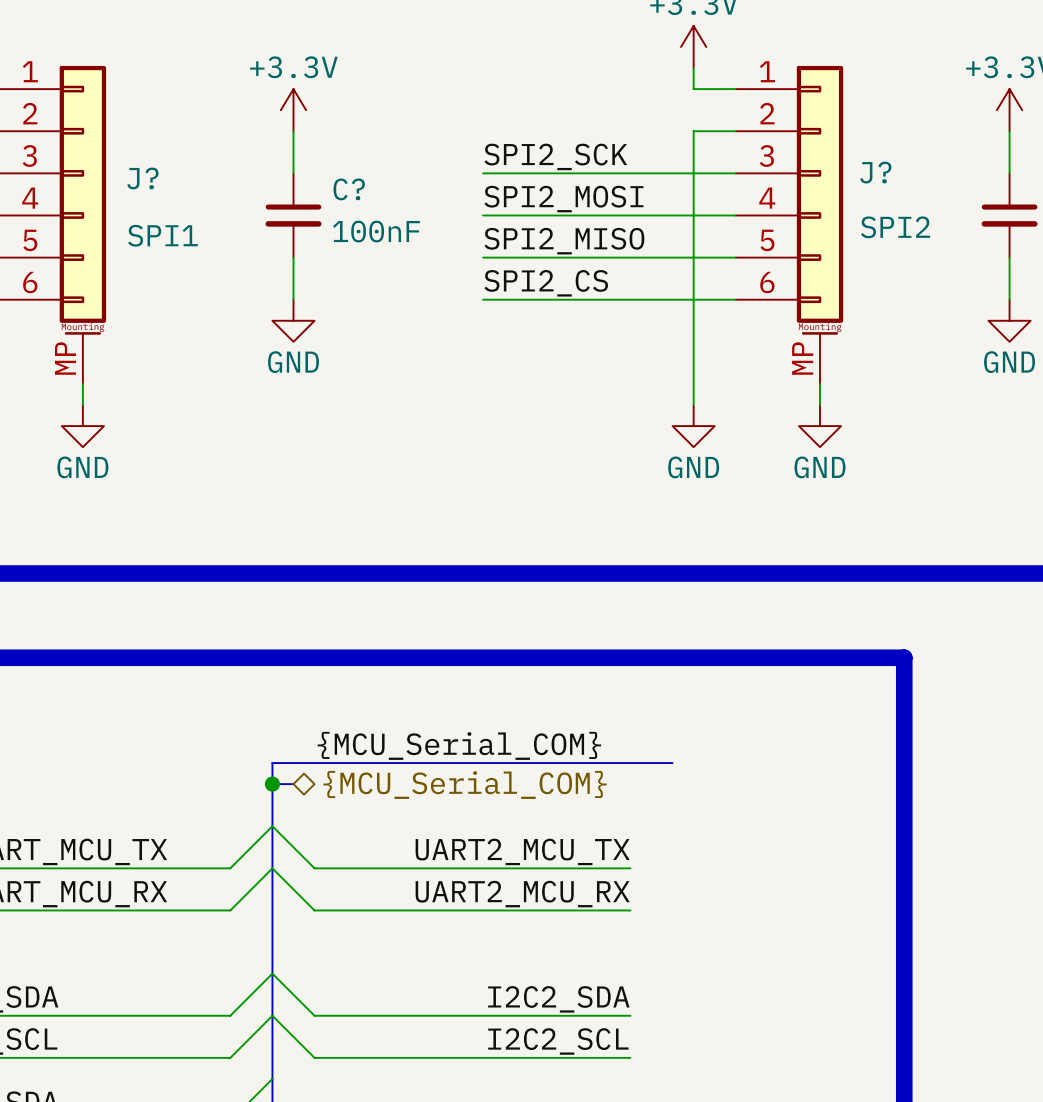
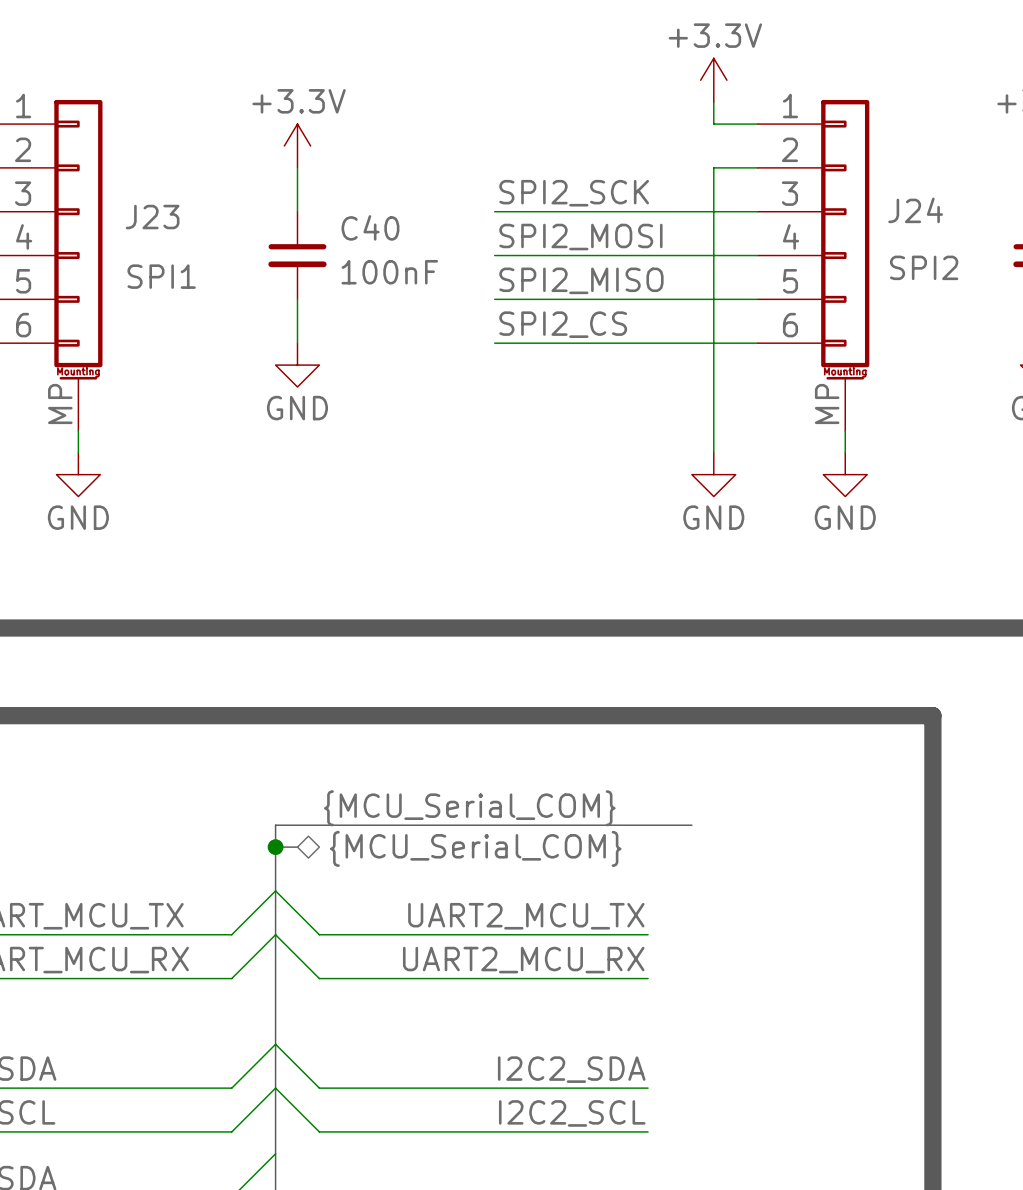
J? name: J? (875, 172) -> J24 (915, 210)
J? name: J? (142, 178) -> J23 (152, 217)
C? name: C? (349, 189) -> C40 (370, 227)

